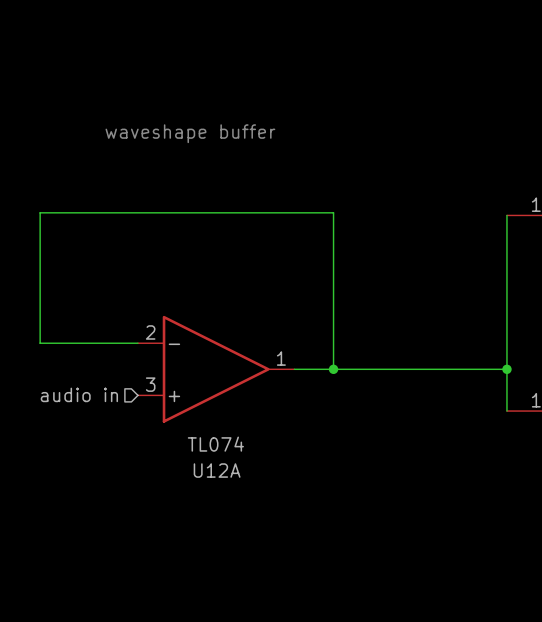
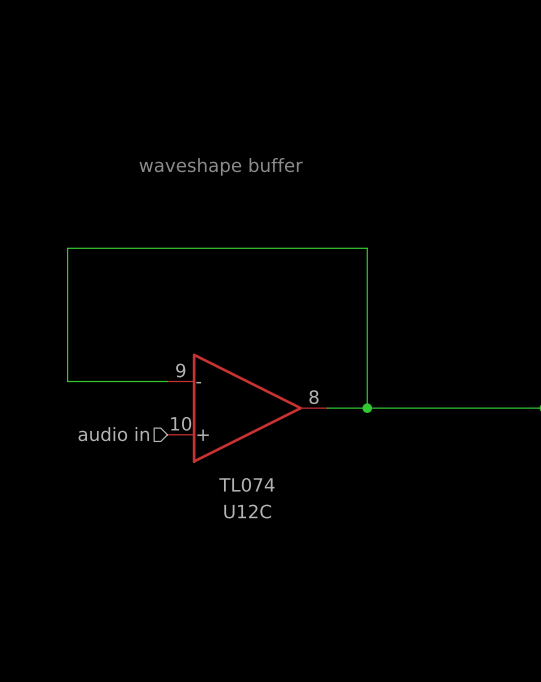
U12A pin number: 2 (150, 332) -> 9 (180, 370)
U12A pin number: 1 (281, 358) -> 8 (313, 397)
U12A pin number: 3 (150, 384) -> 10 (181, 423)
U12A name: U12A (217, 470) -> U12C (247, 511)

